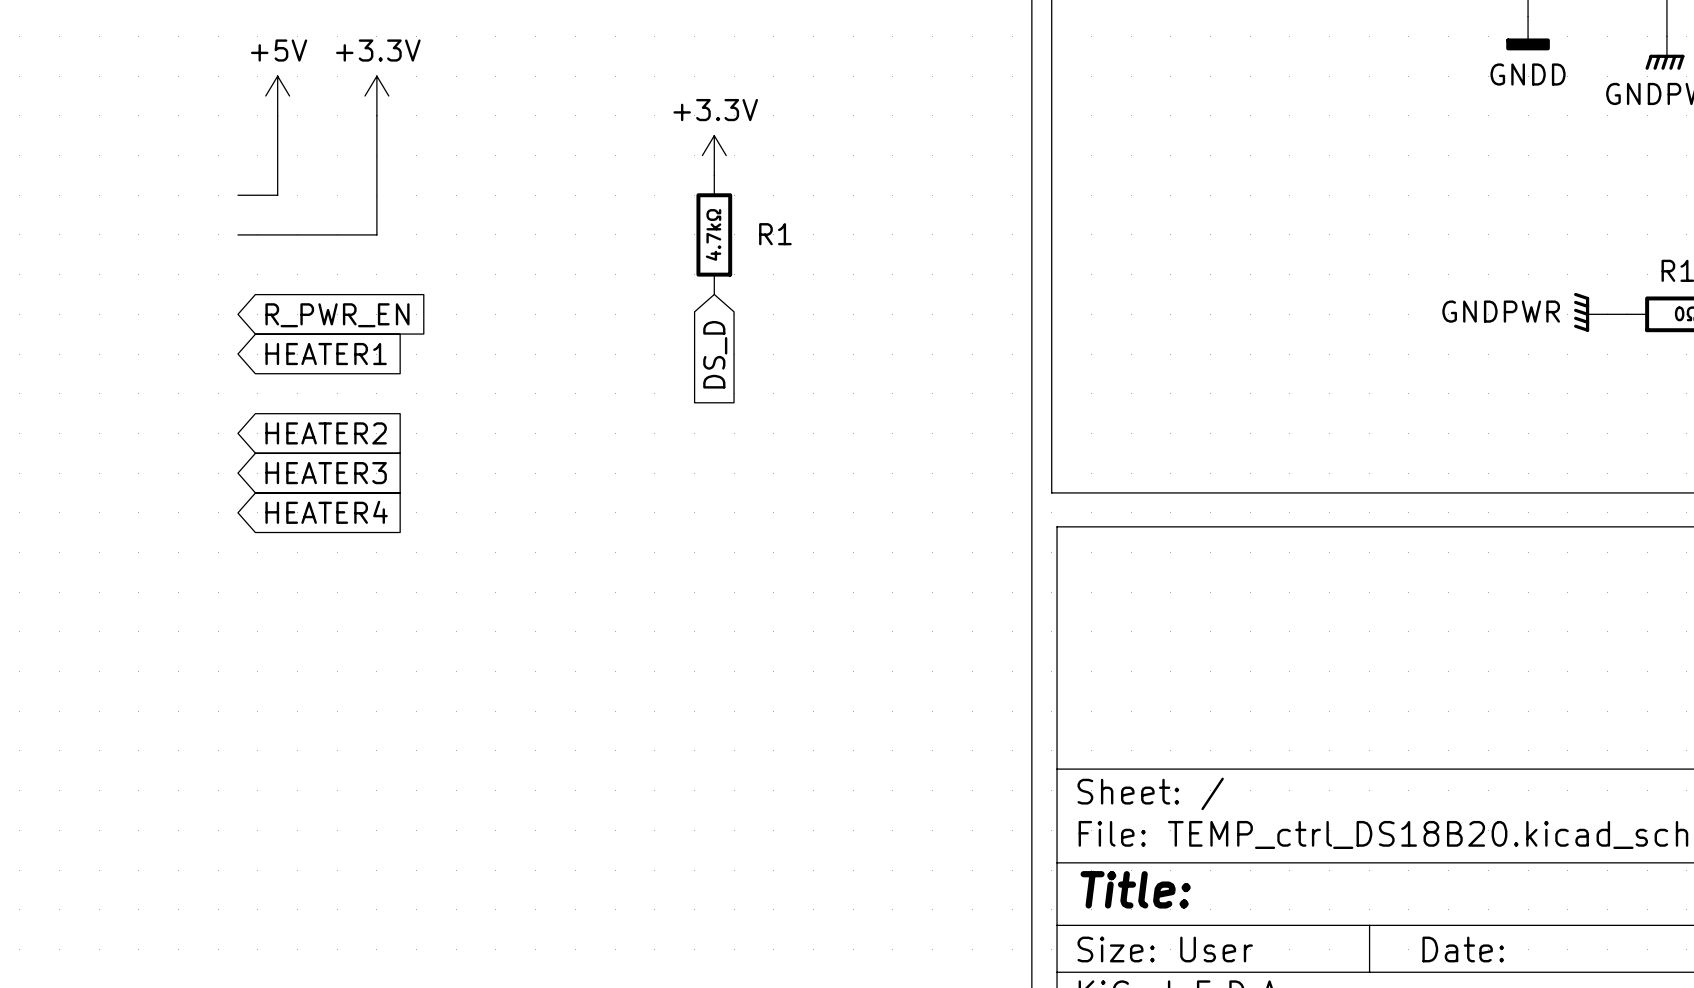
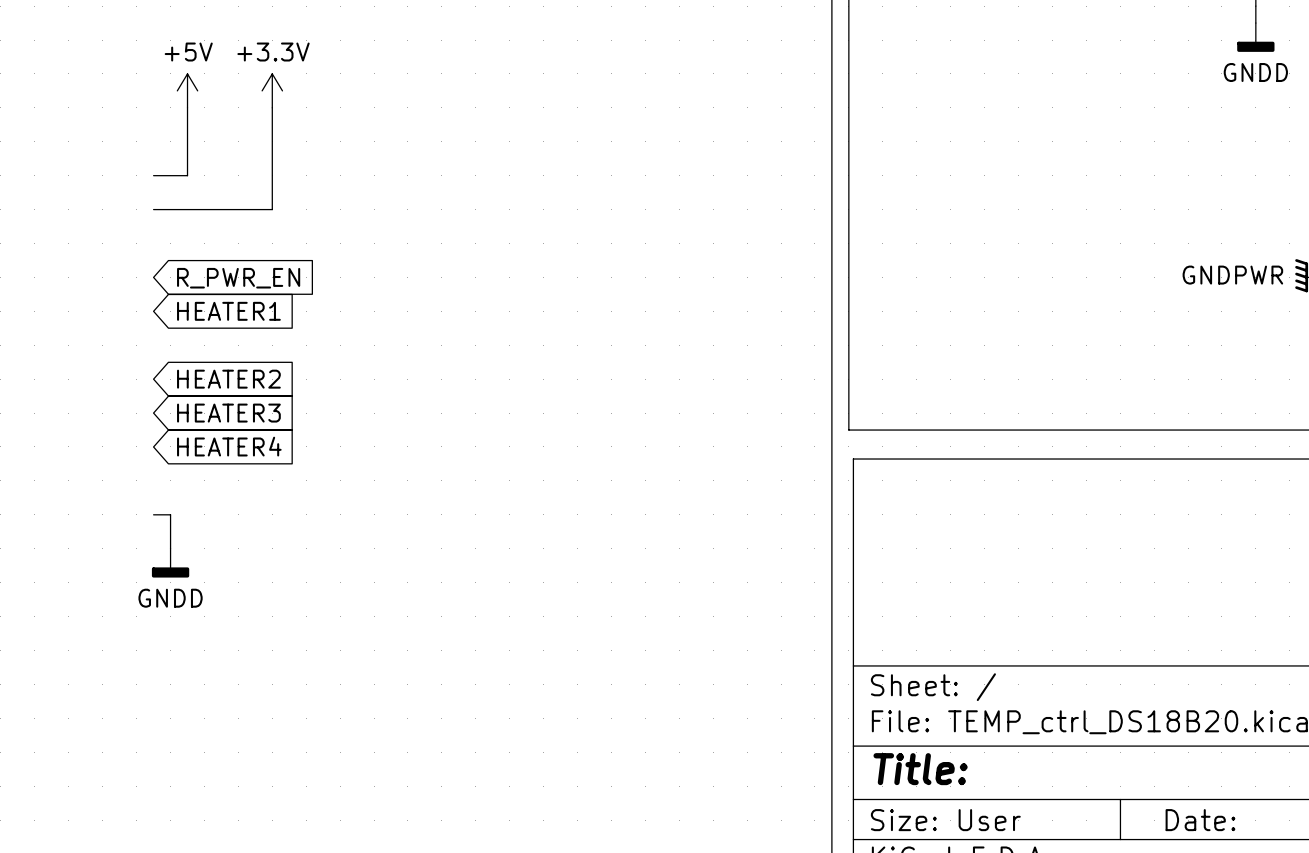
power symbol: +3.3V (714, 155) -> none
R1: 4.7kΩ (714, 234) -> none
global label: DS_D (715, 354) -> none
wire: none -> (153, 514) (170, 514) (170, 548)
power symbol: none -> GNDD (170, 563)

